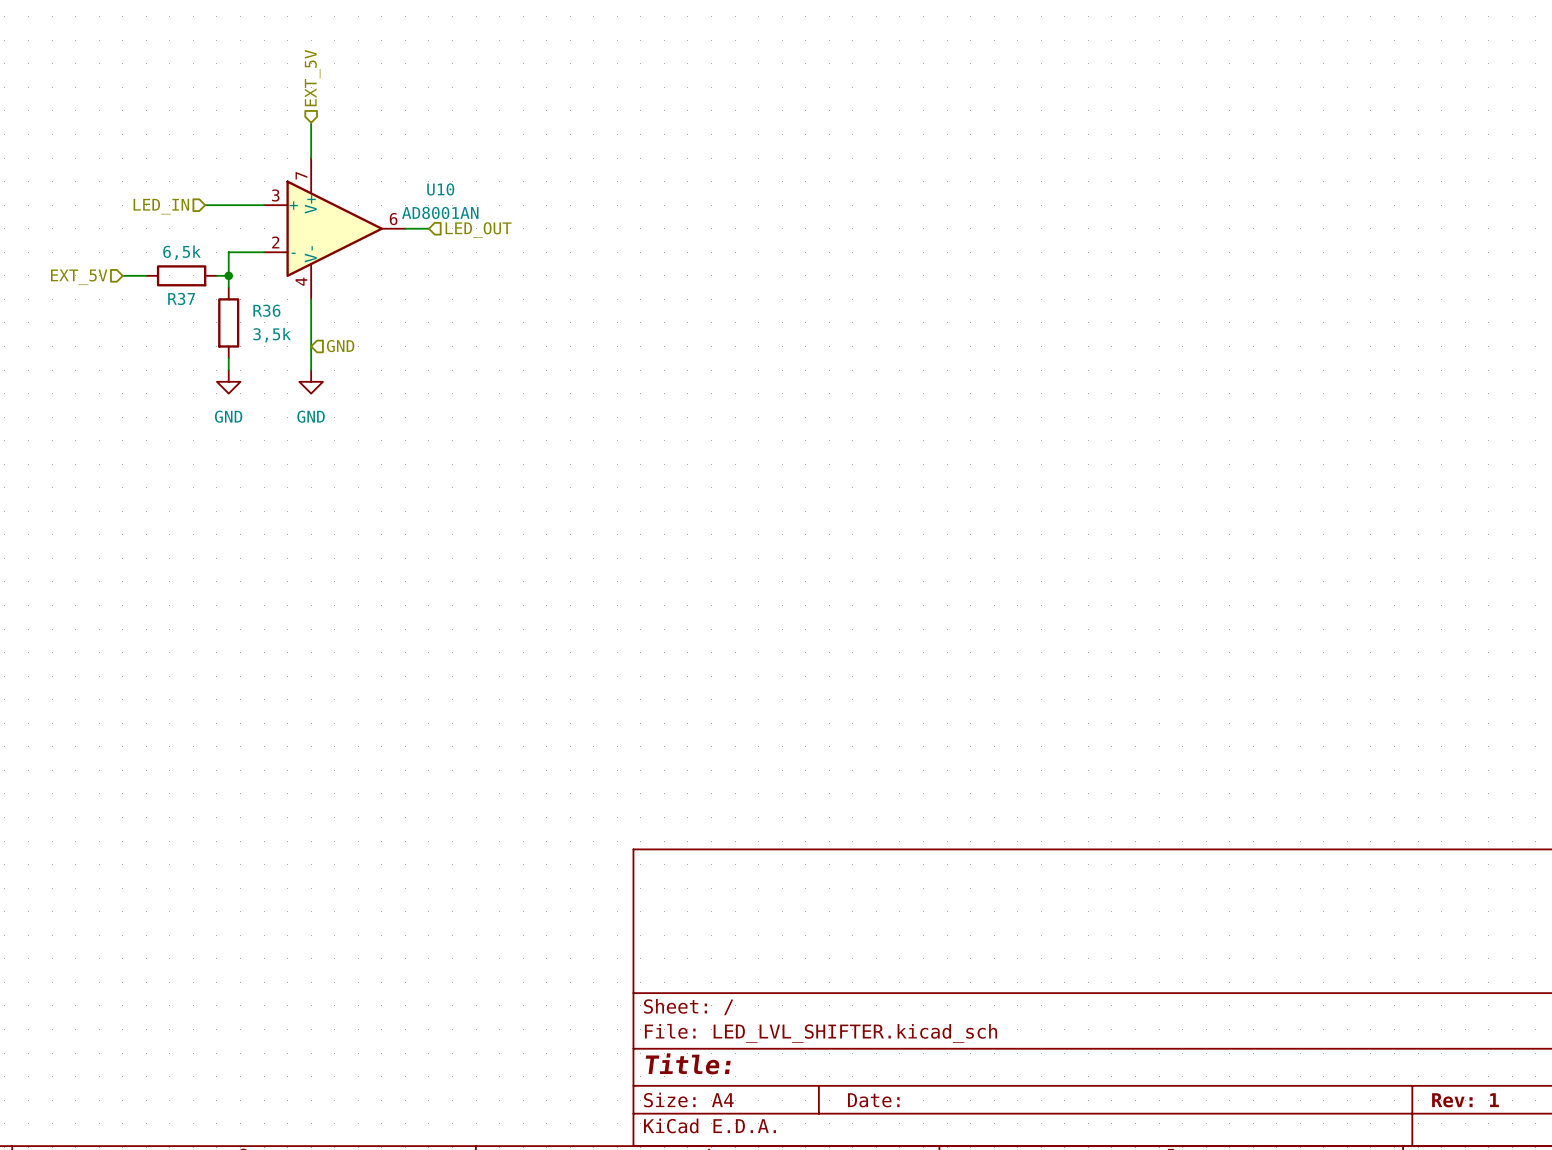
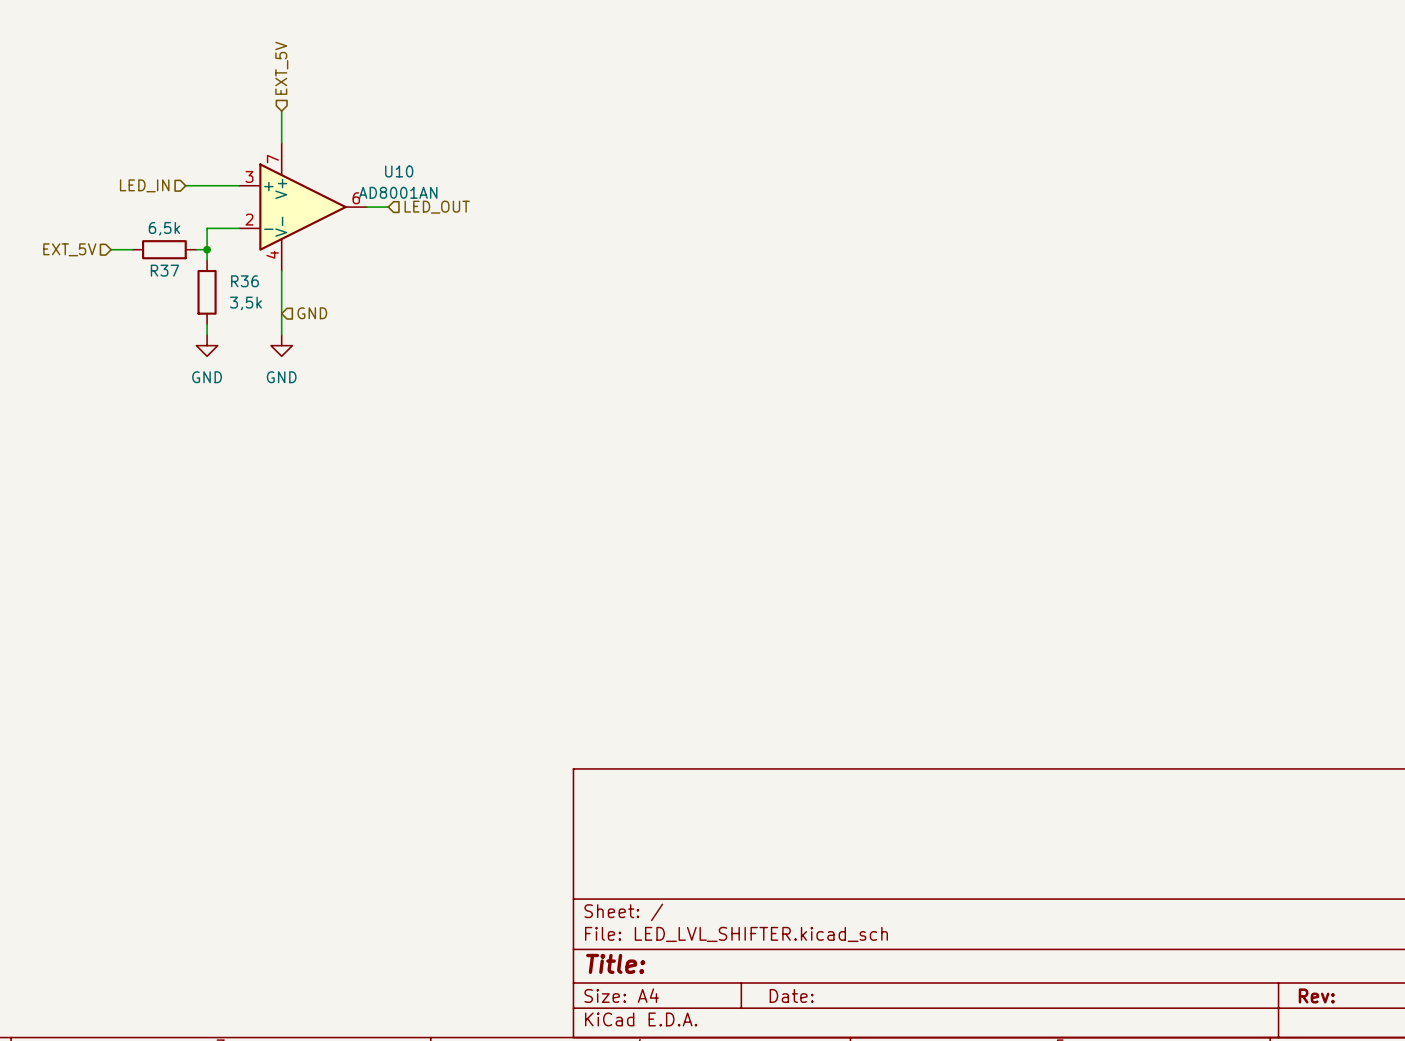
title block: Rev: 1 (1465, 1100) -> Rev: (1316, 995)

